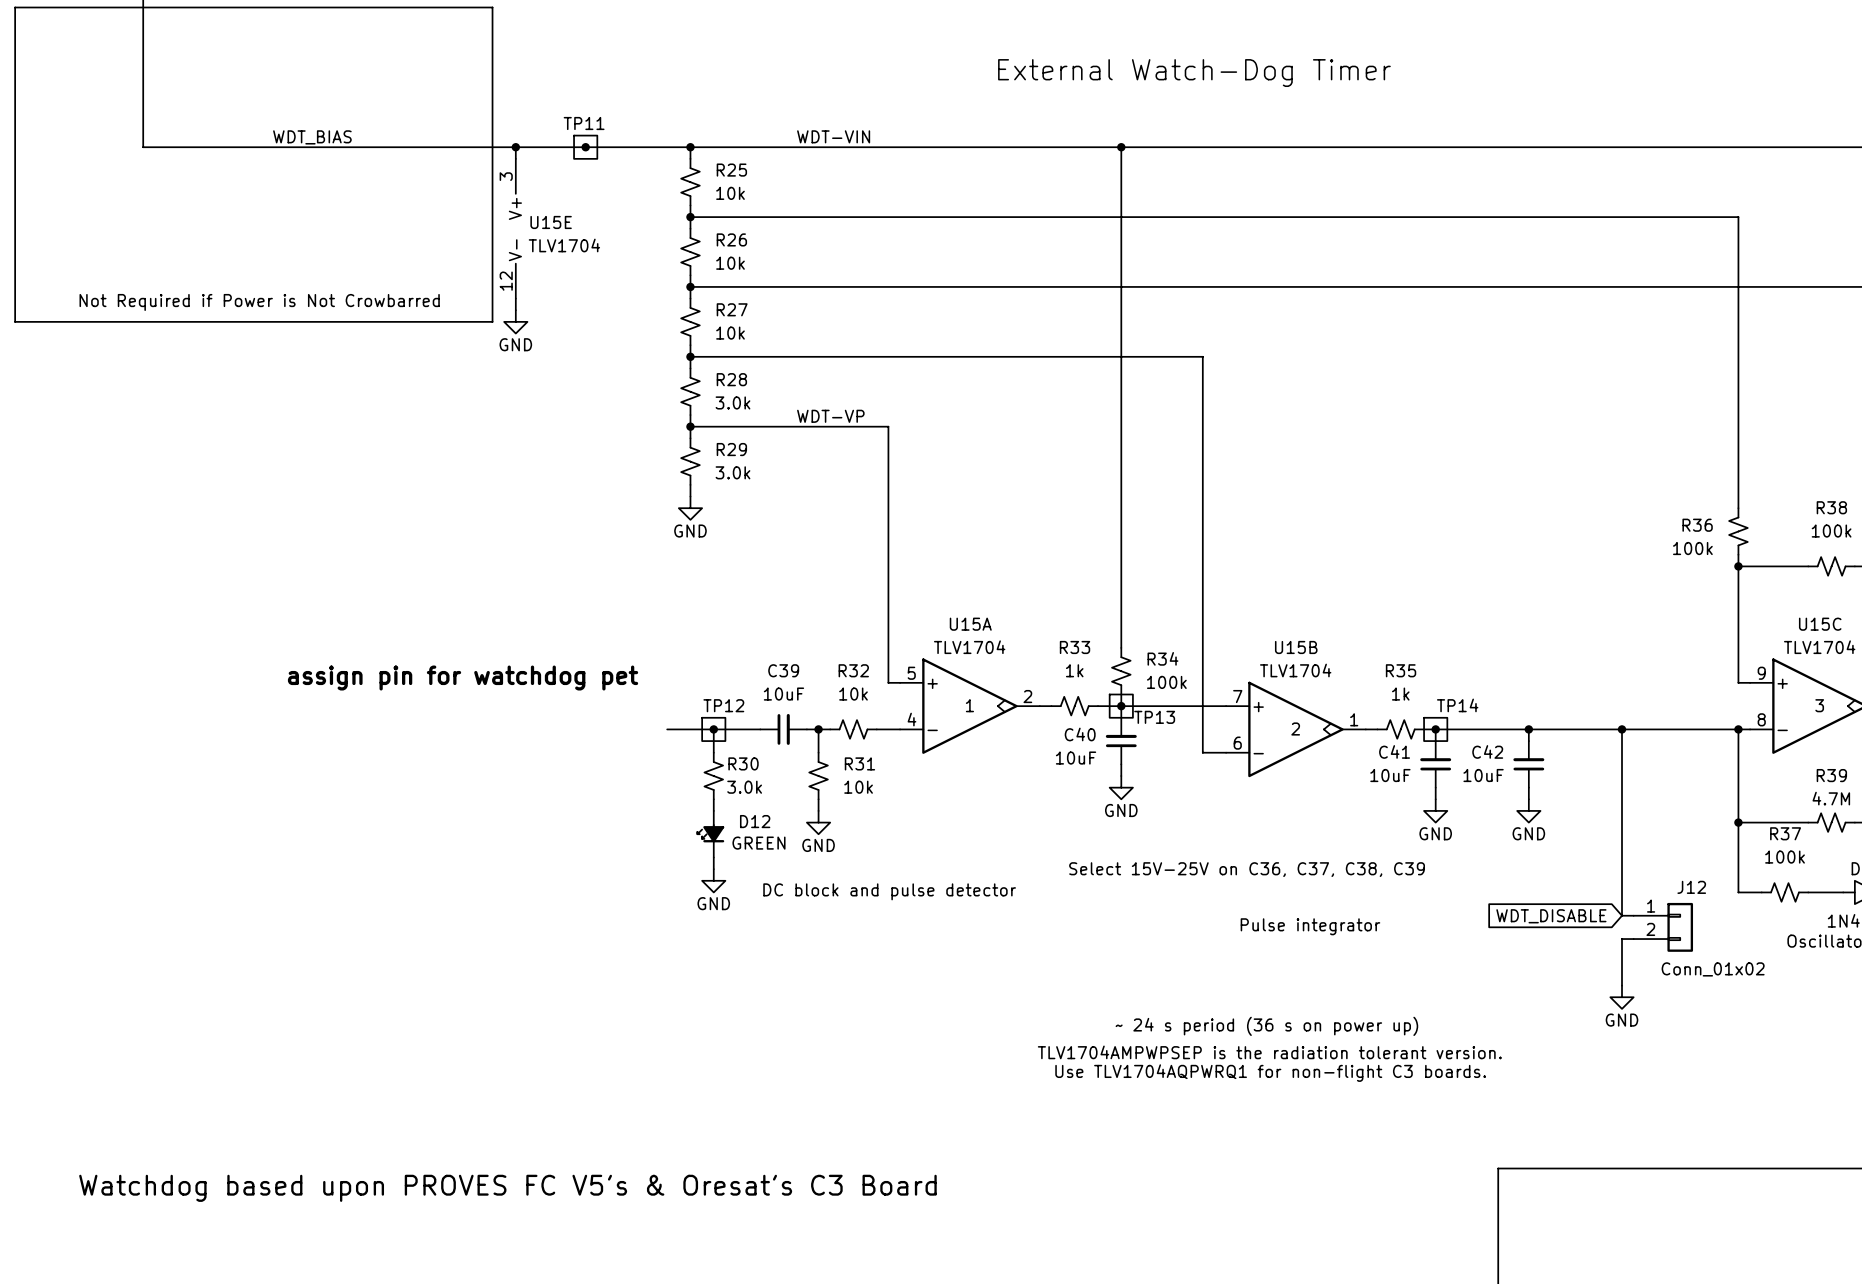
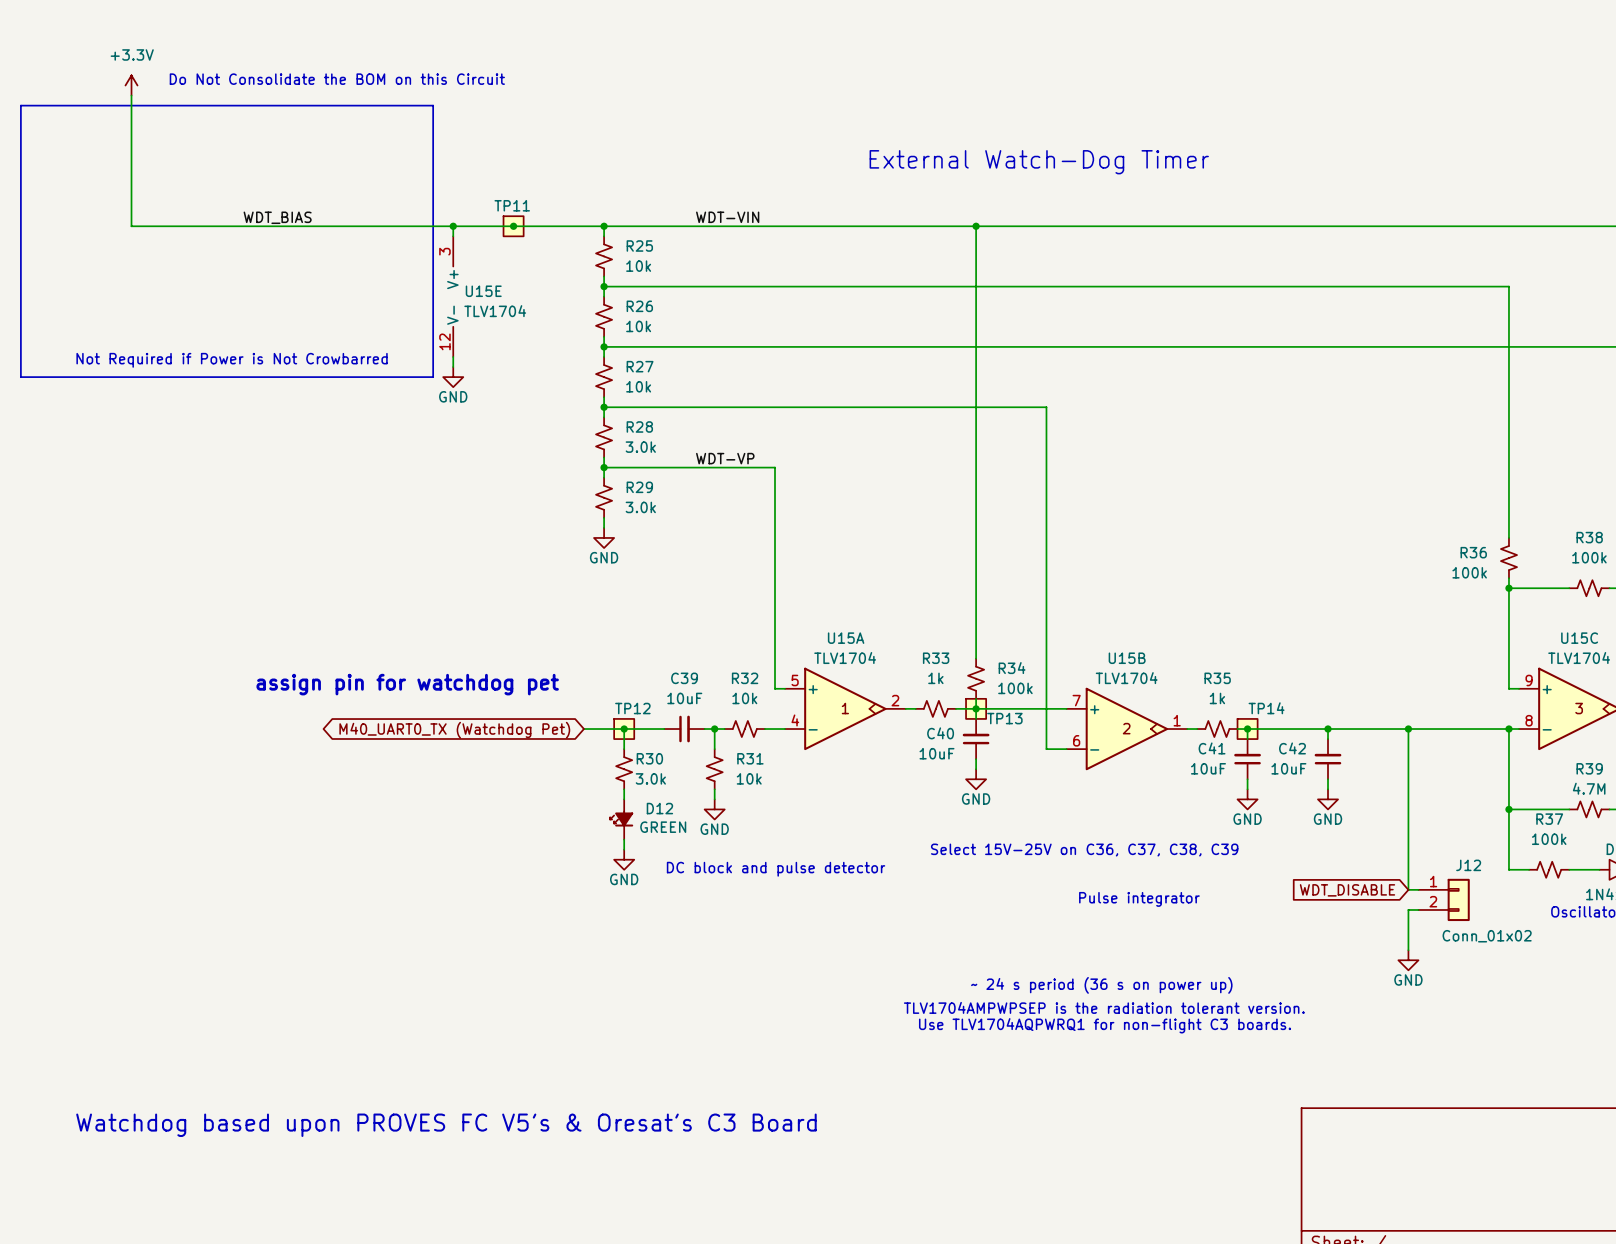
global label: none -> M40_UART0_TX (Watchdog Pet) (454, 730)

